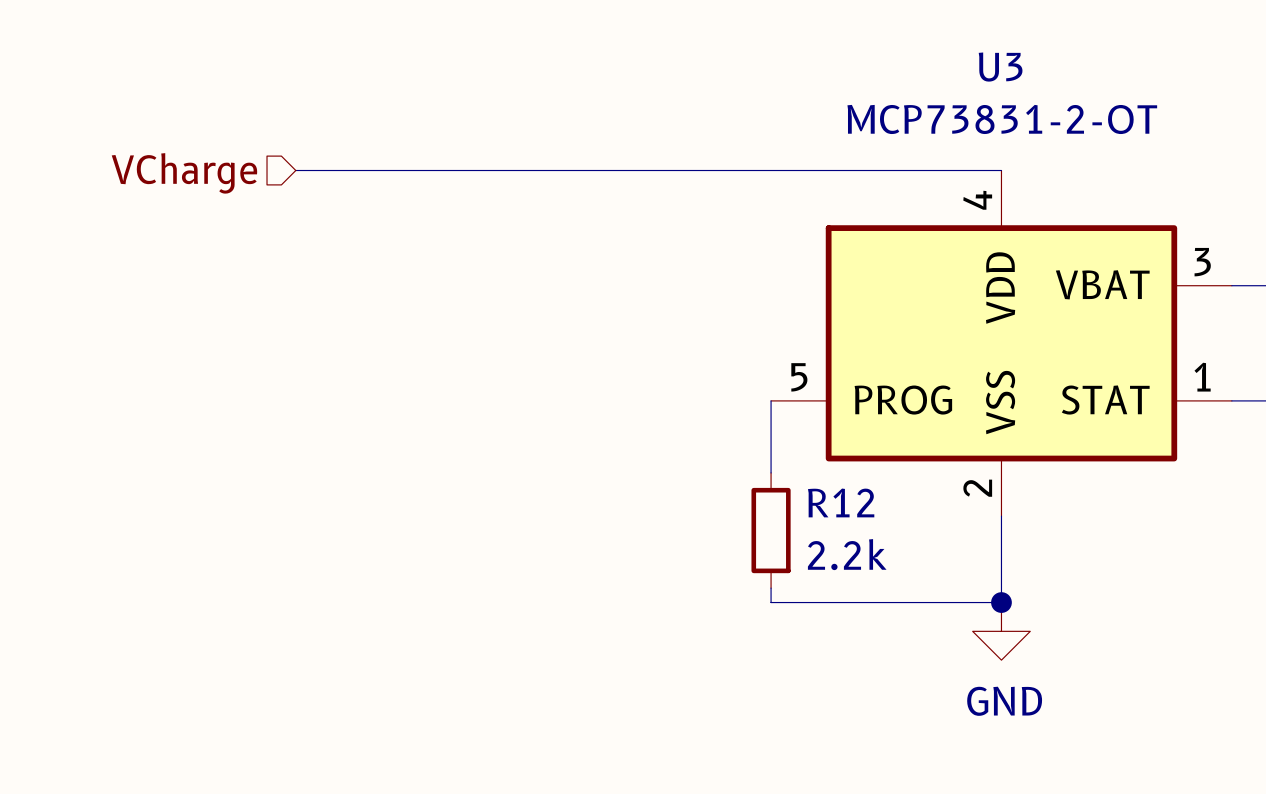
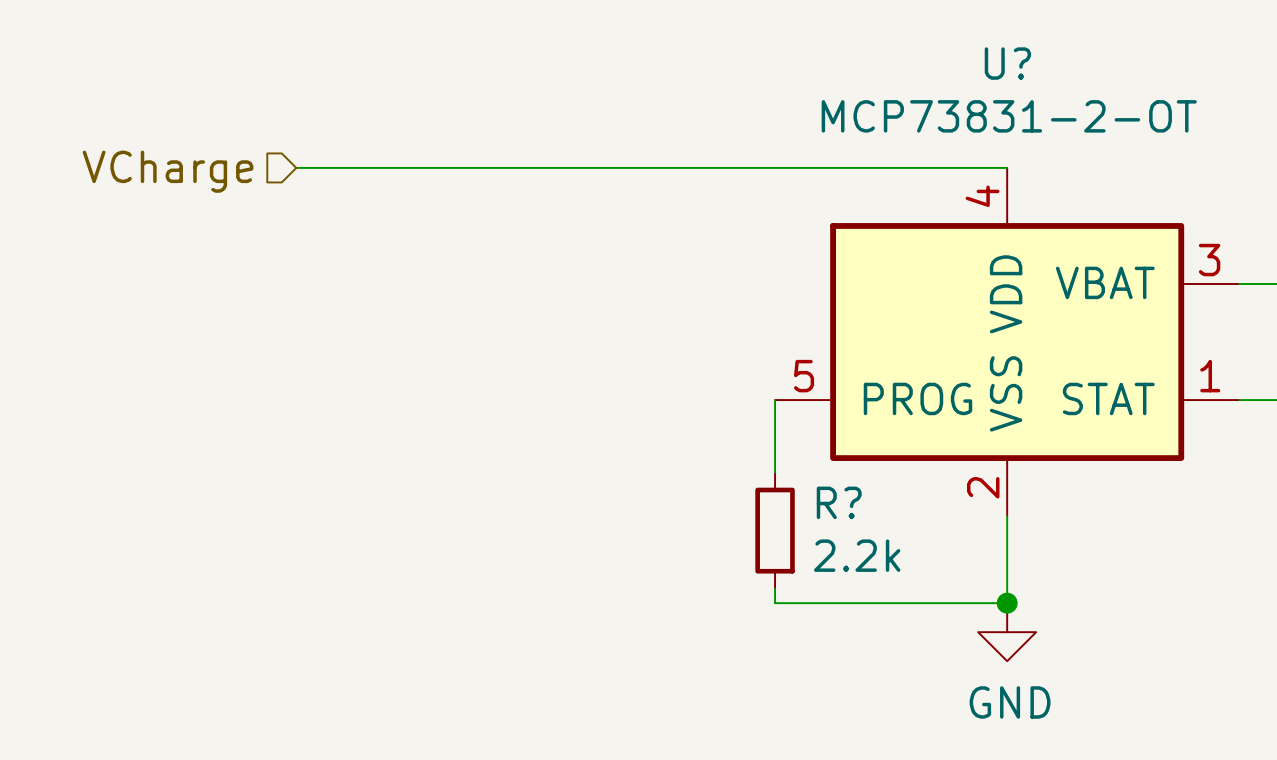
U3 name: U3 (1000, 67) -> U? (1007, 63)
R12 name: R12 (841, 502) -> R? (839, 502)

